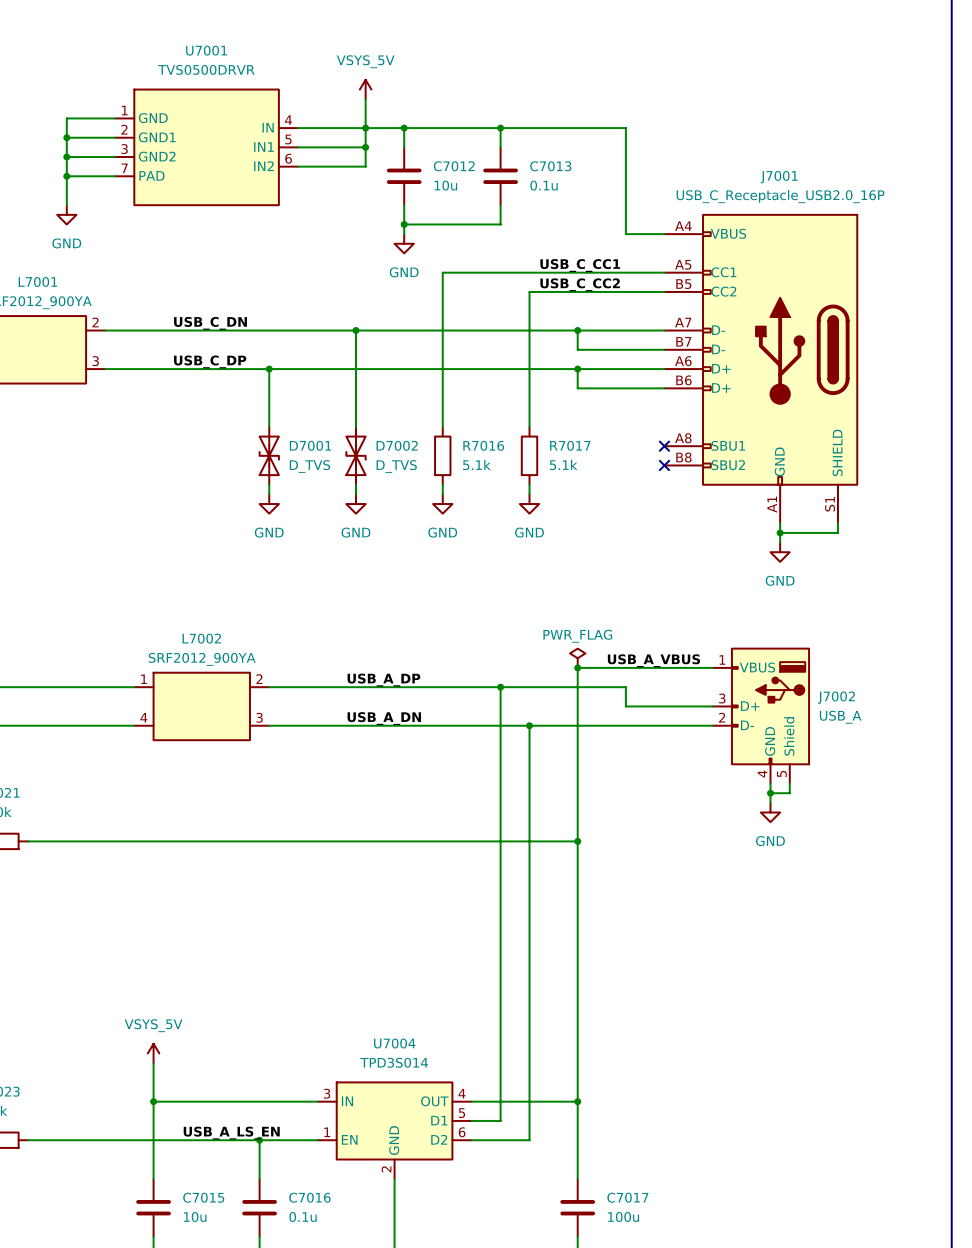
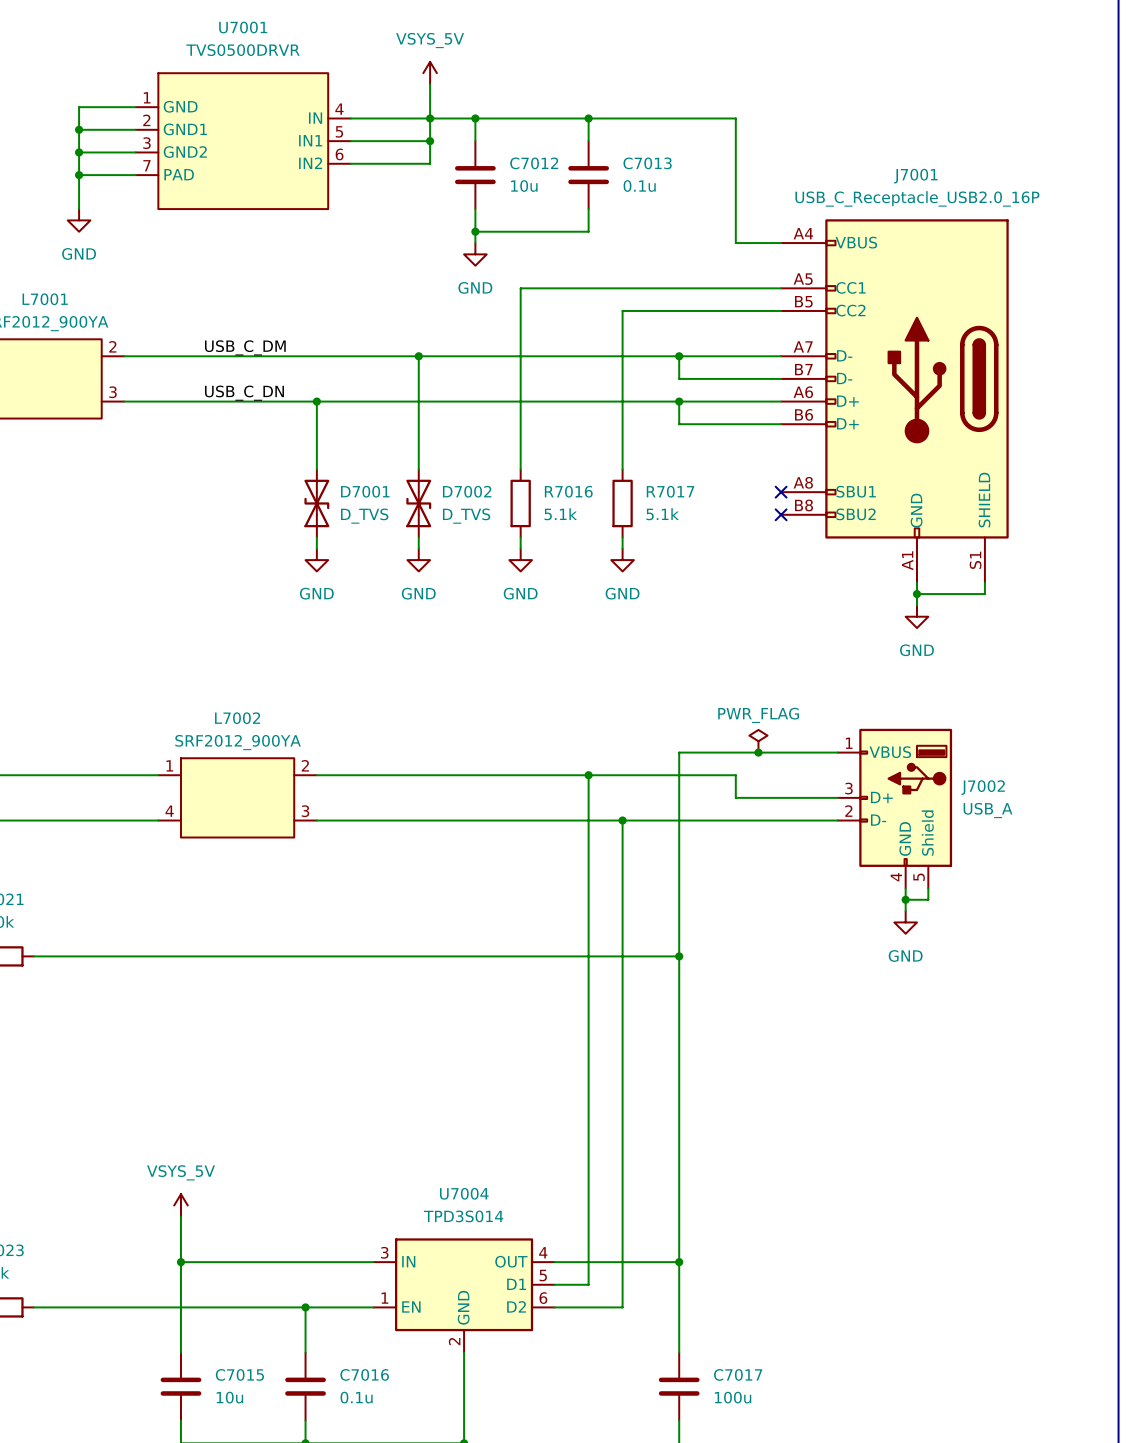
label: USB_C_CC1 (580, 265) -> none
label: USB_C_CC2 (580, 284) -> none
label: USB_C_DN (210, 323) -> USB_C_DM (245, 347)
label: USB_C_DP (210, 361) -> USB_C_DN (244, 393)
power symbol position: PWR_FLAG (577, 658) -> PWR_FLAG (758, 741)
label: USB_A_VBUS (653, 660) -> none
junction: (577, 667) -> none
junction: none -> (758, 752)
label: USB_A_DP (383, 680) -> none
label: USB_A_DN (384, 718) -> none
label: USB_A_LS_EN (231, 1133) -> none

